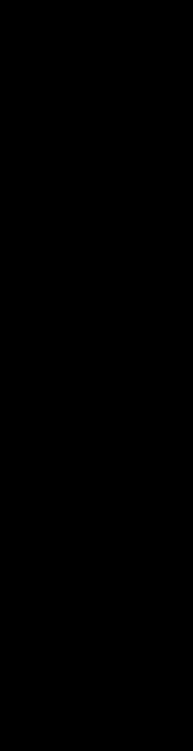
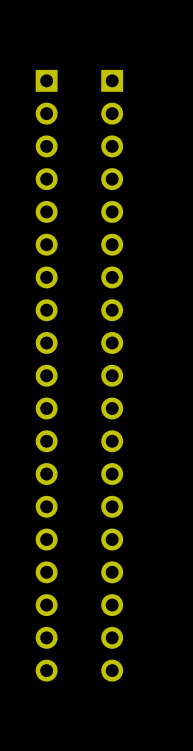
part: none -> (46, 375)
part: none -> (112, 375)

